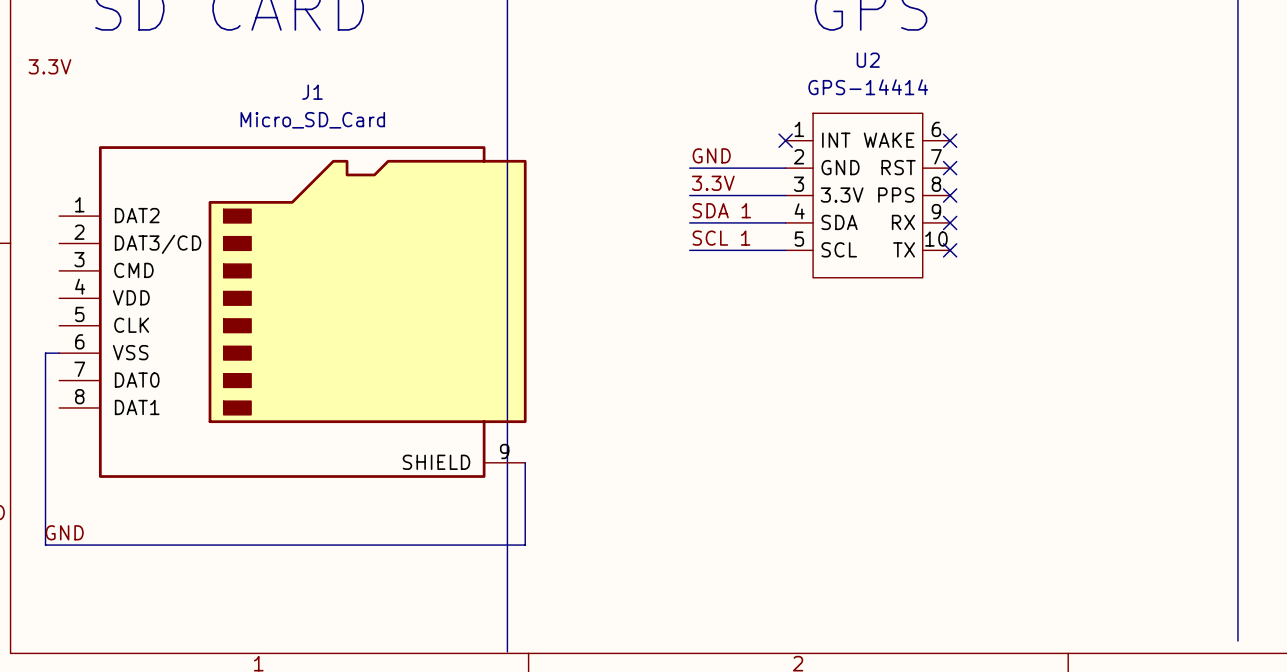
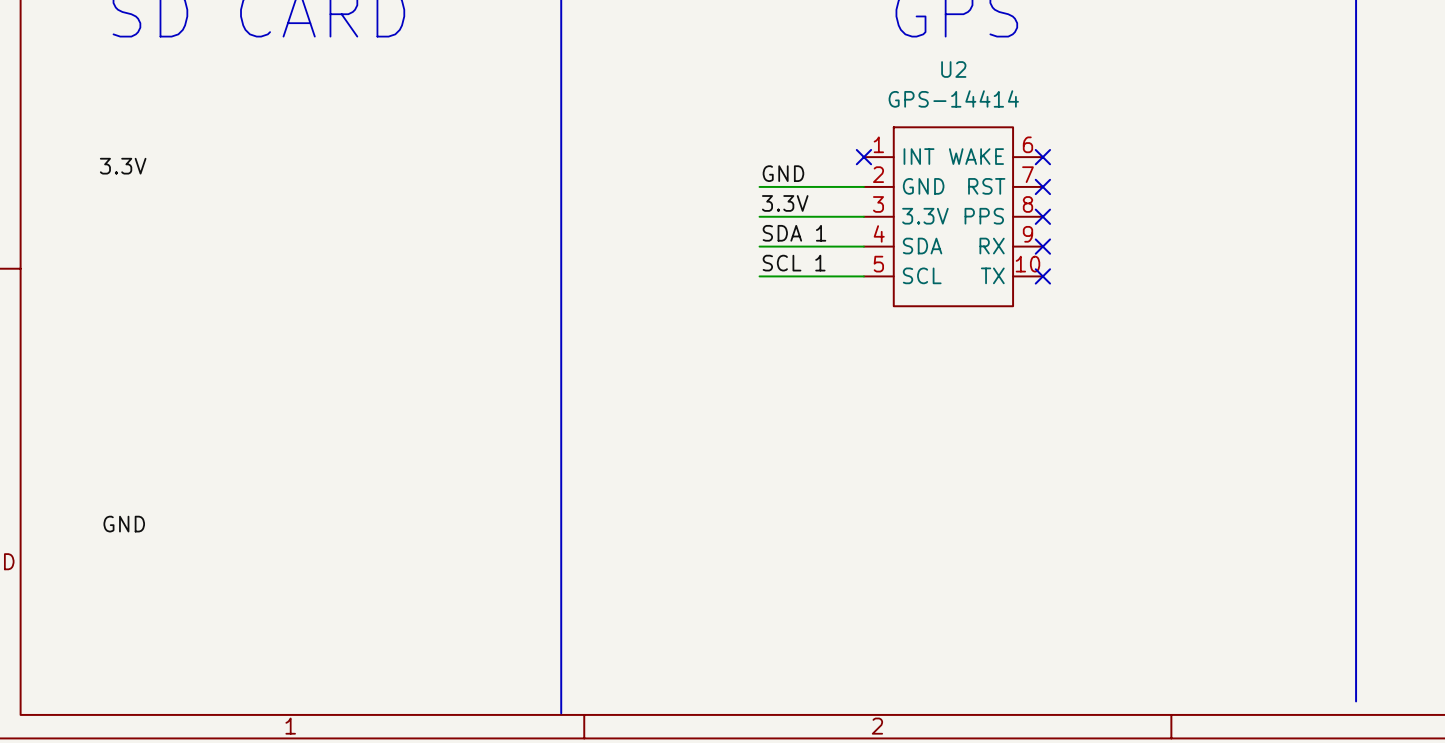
label position: 3.3V (49, 66) -> 3.3V (123, 166)
J1: Micro_SD_Card (292, 312) -> none
wire: (59, 353) (45, 353) (45, 545) (525, 545) (525, 462) -> none
label position: GND (64, 532) -> GND (124, 524)

